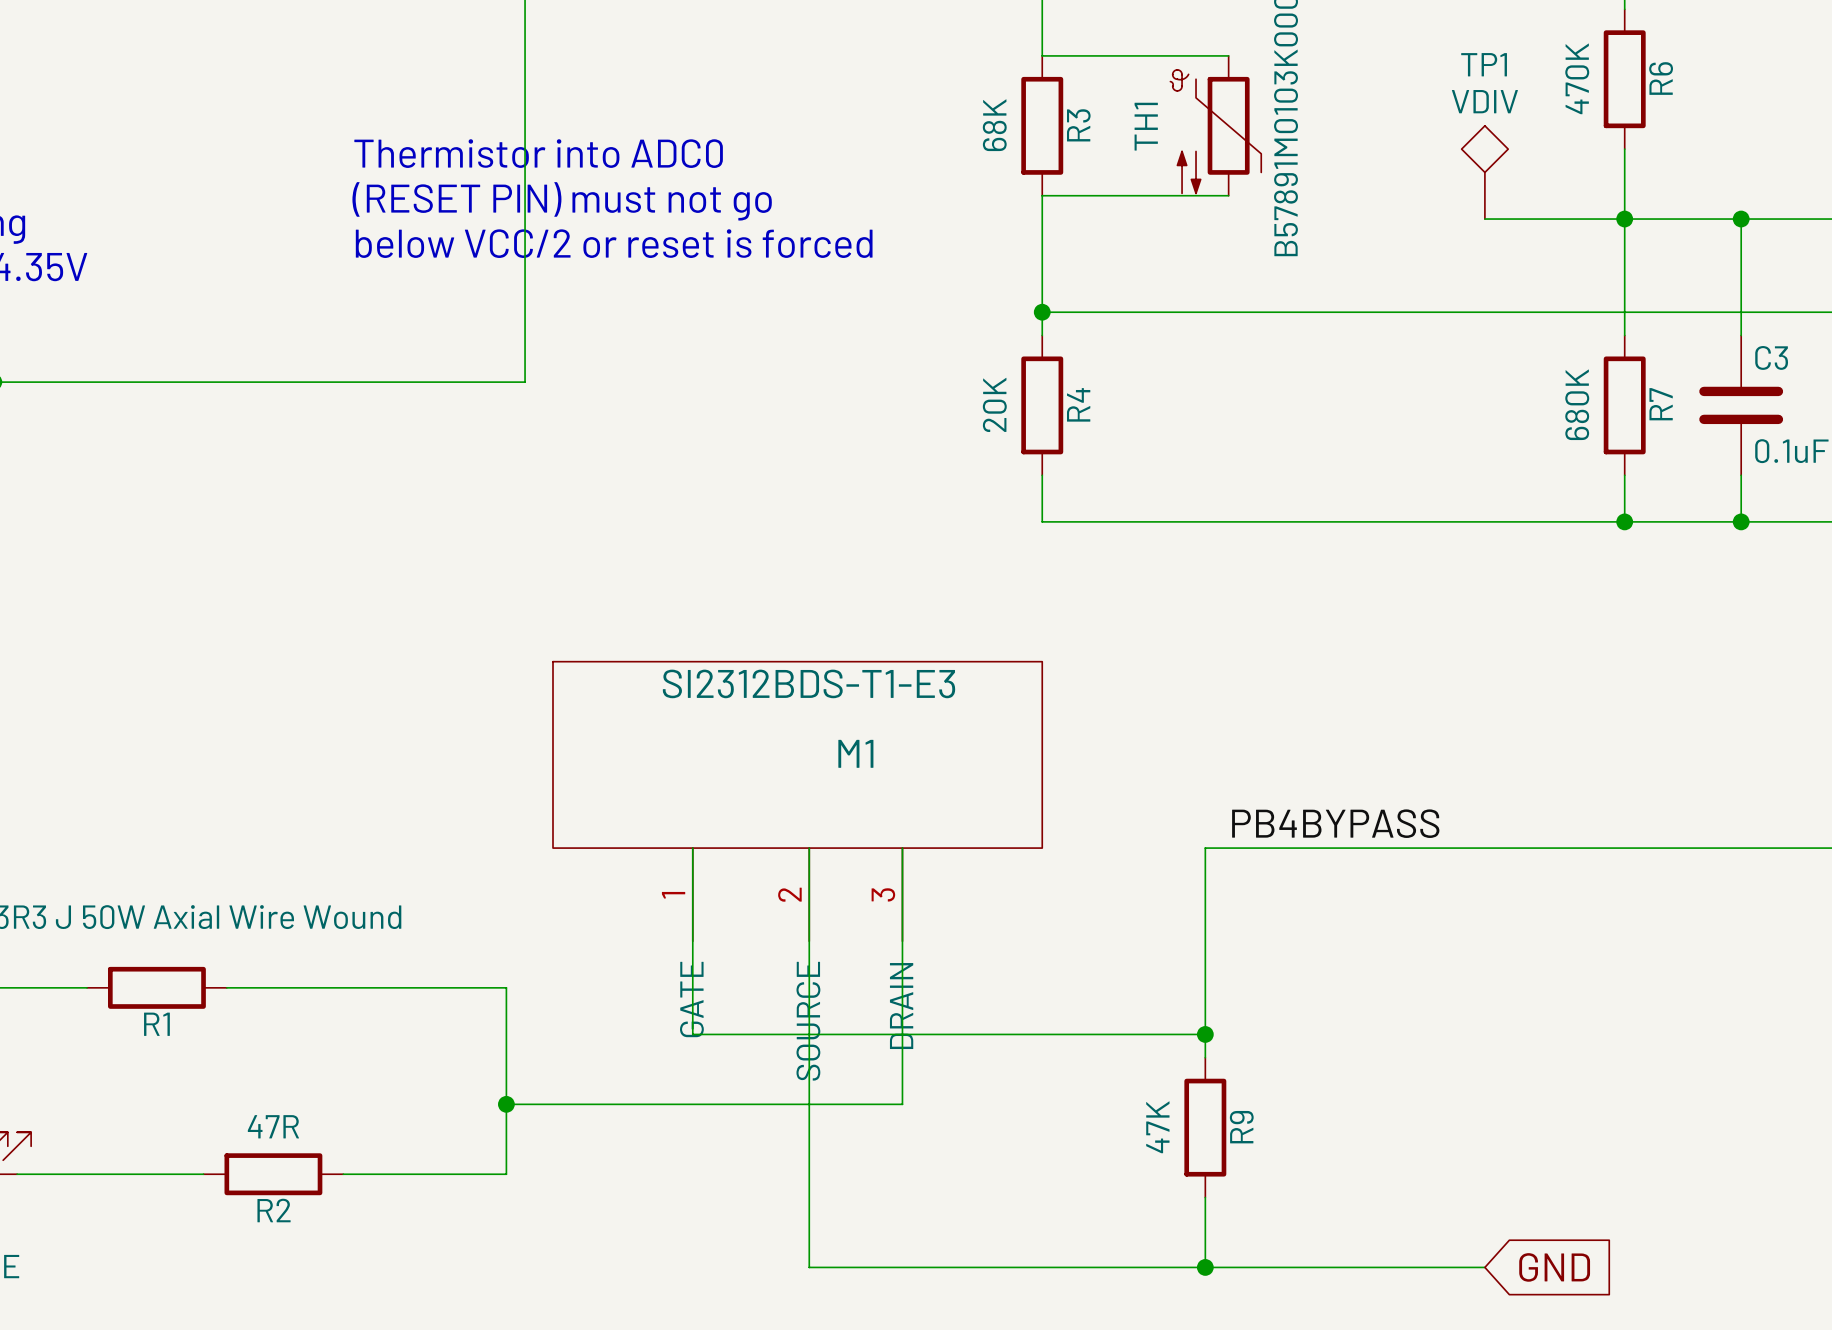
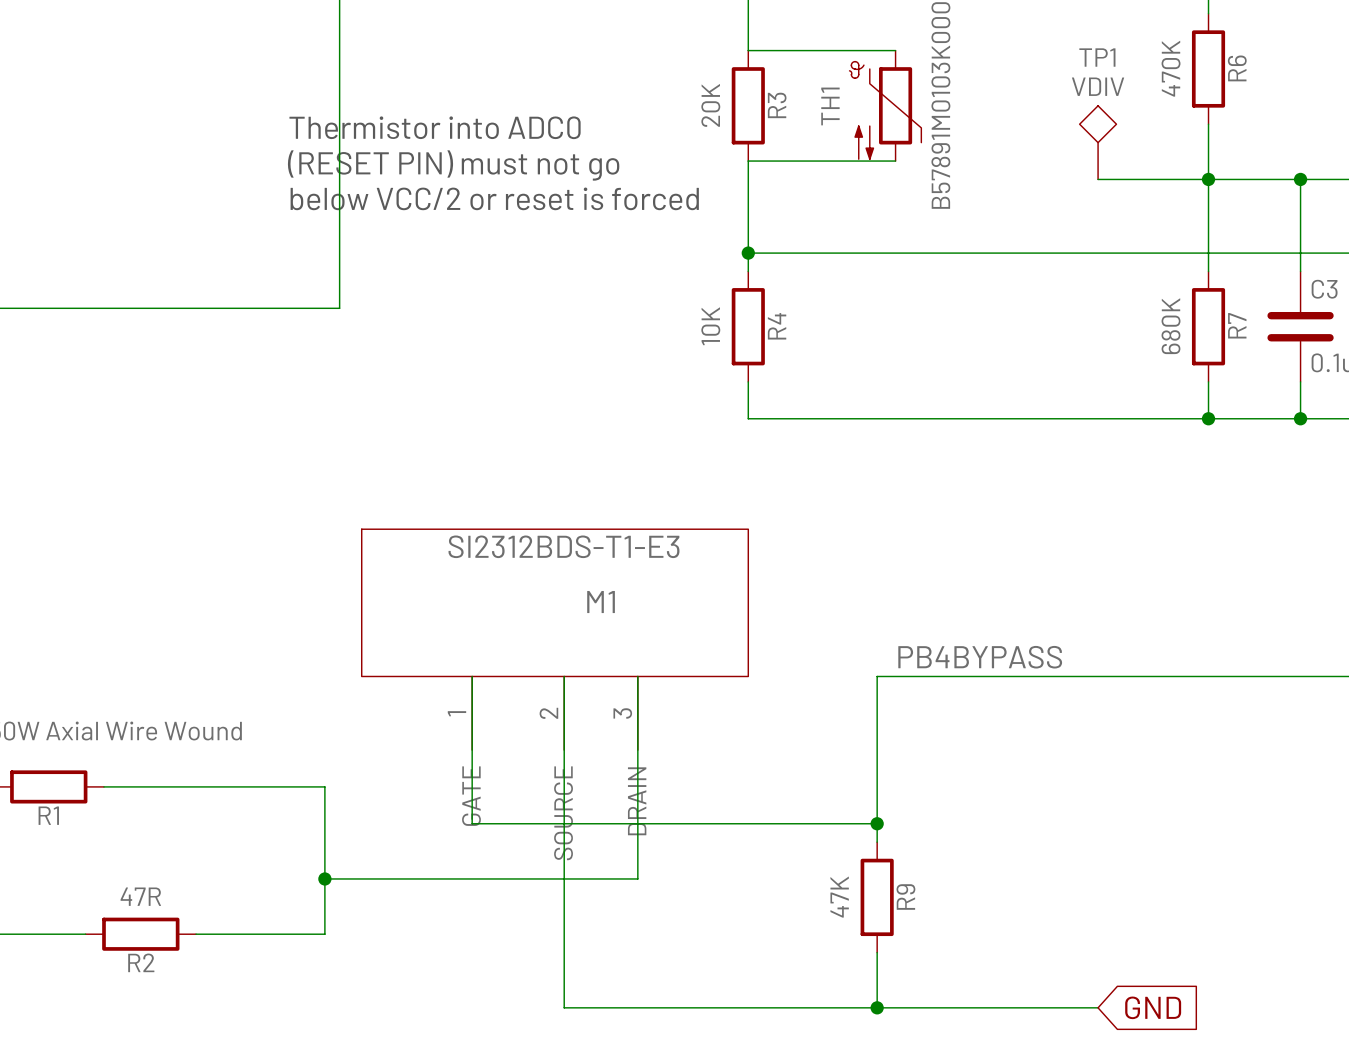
R3 value: 68K (994, 125) -> 20K (710, 105)
text position: Thermistor into ADC0 (538, 153) -> Thermistor into ADC0 (435, 127)
text position: (RESET PIN) must not go (562, 201) -> (RESET PIN) must not go (453, 165)
text position: below VCC/2 or reset is forced (614, 243) -> below VCC/2 or reset is forced (494, 198)
R4 value: 20K (994, 404) -> 10K (710, 326)

